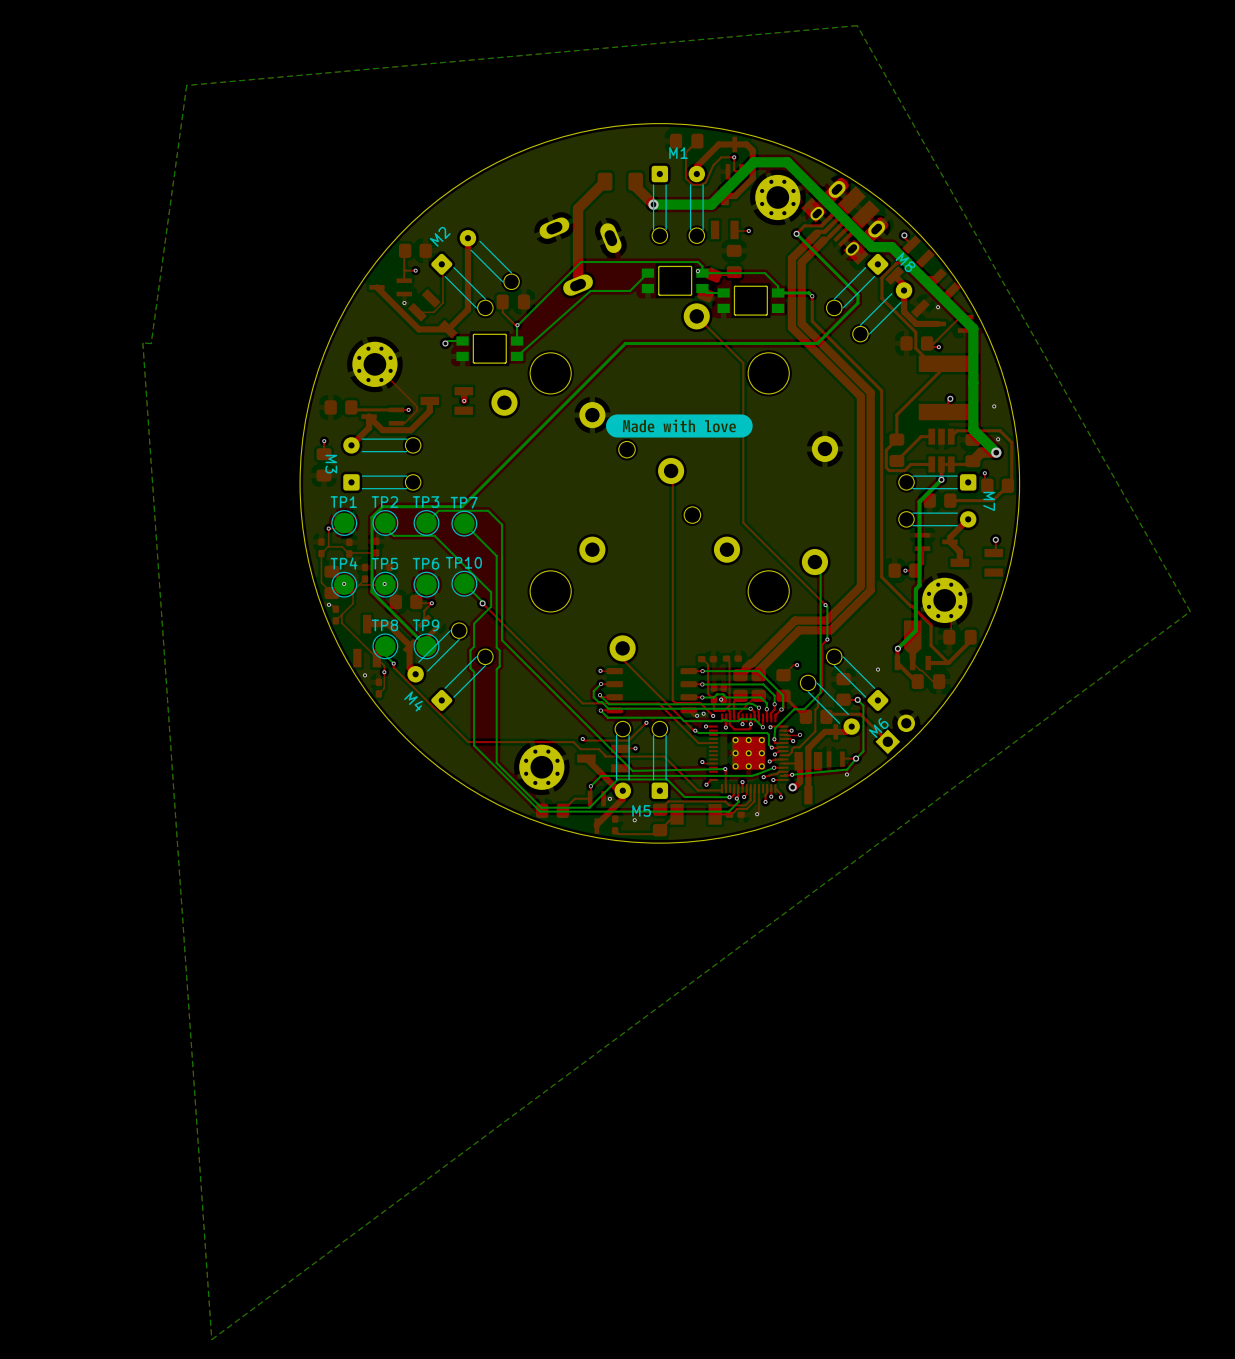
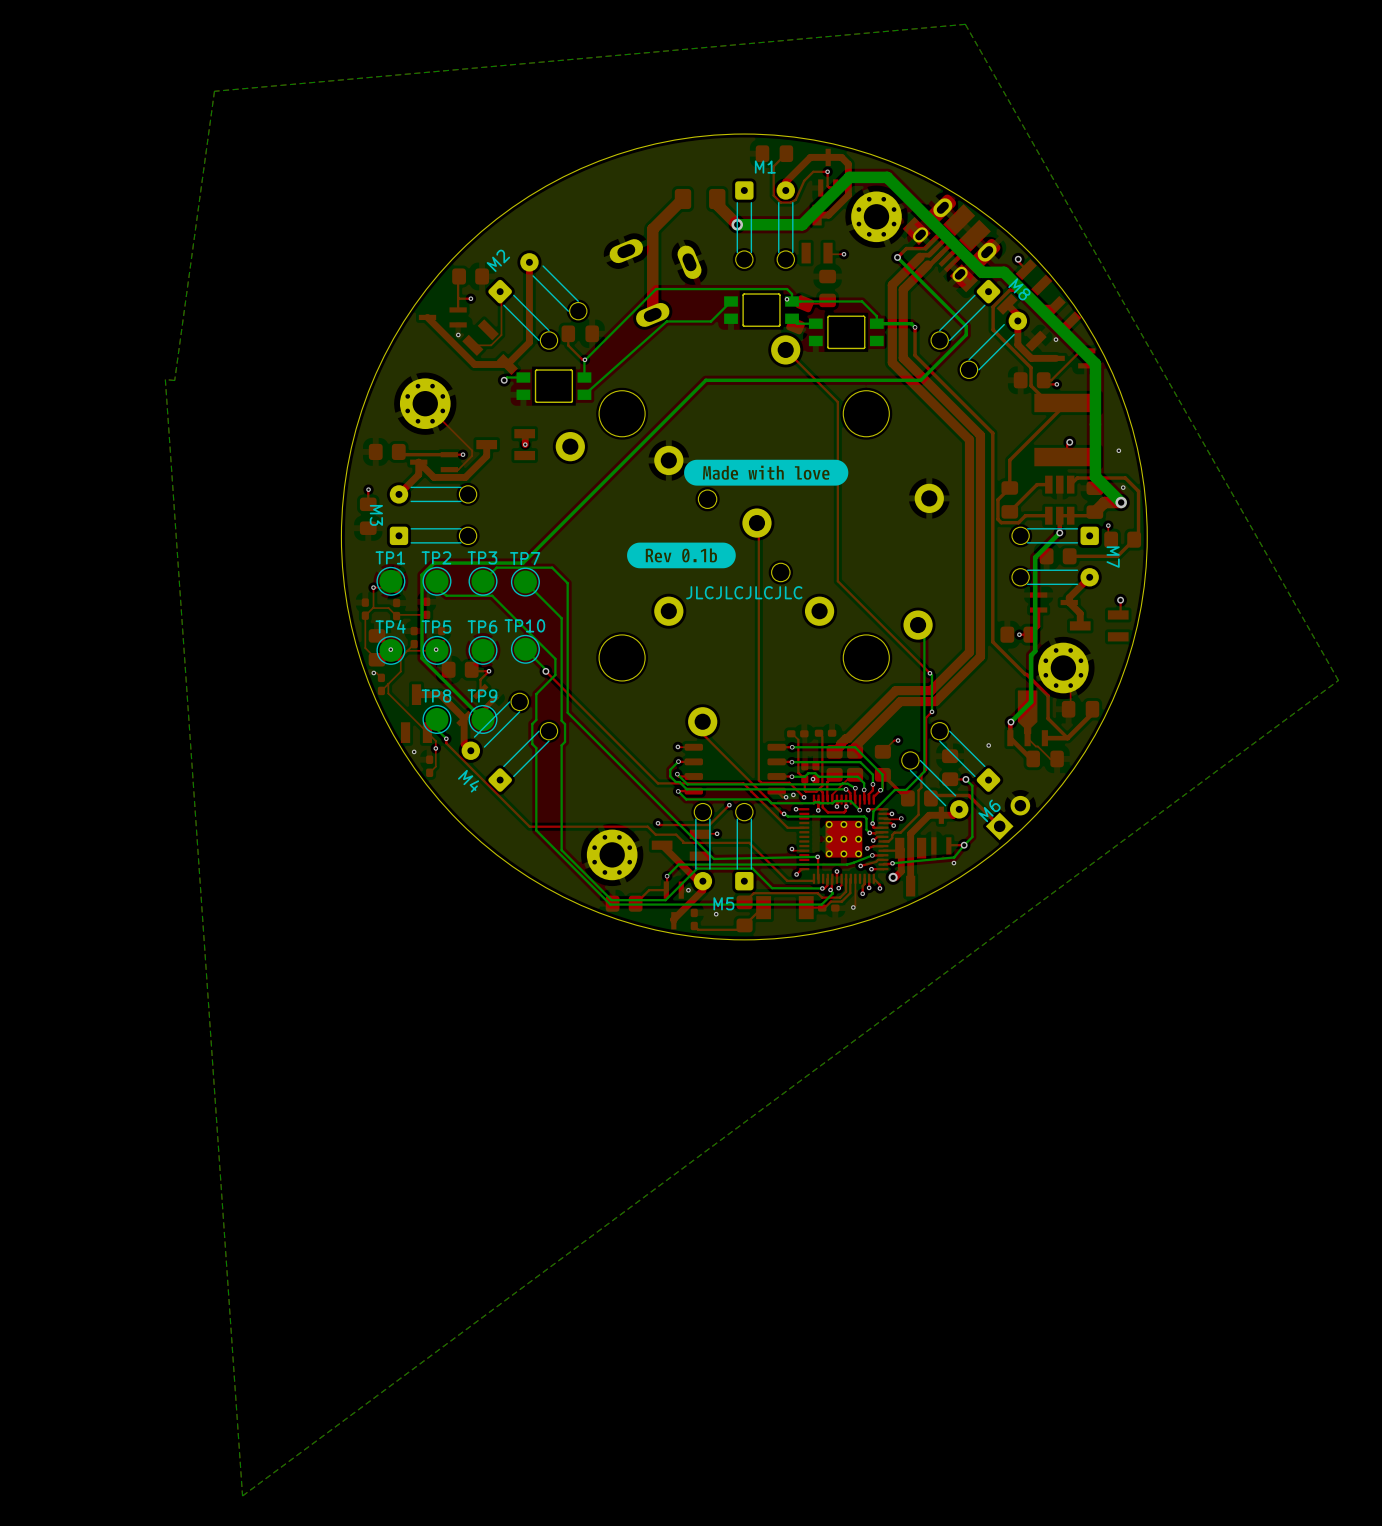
drawing: none -> [627, 542, 736, 569]
text: none -> JLCJLCJLCJLC (744, 592)

